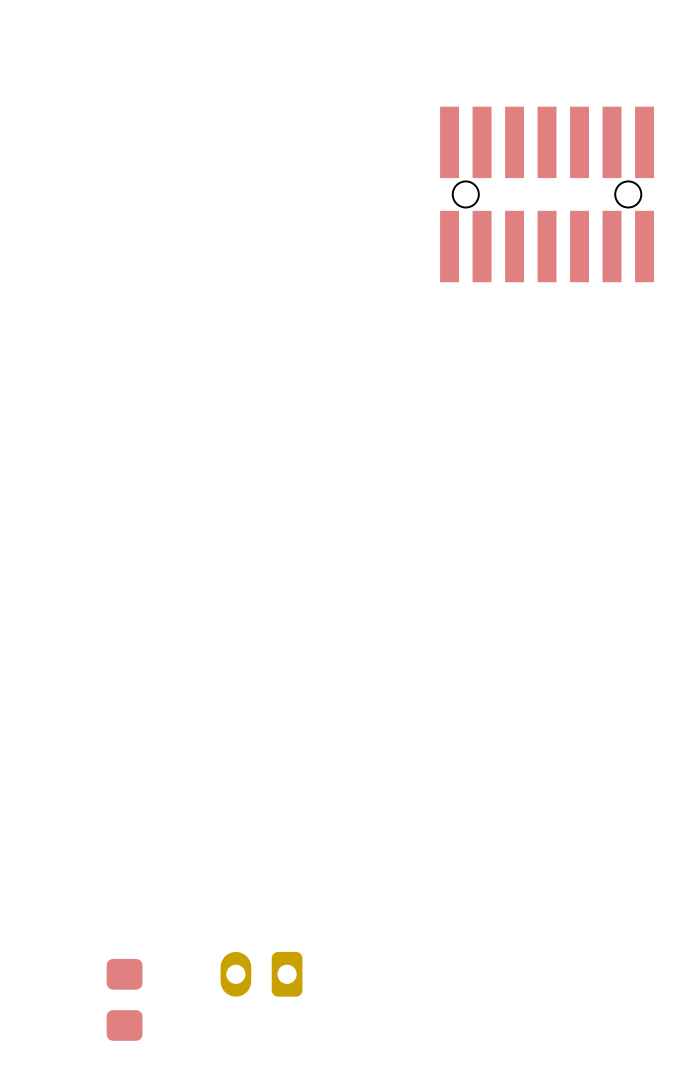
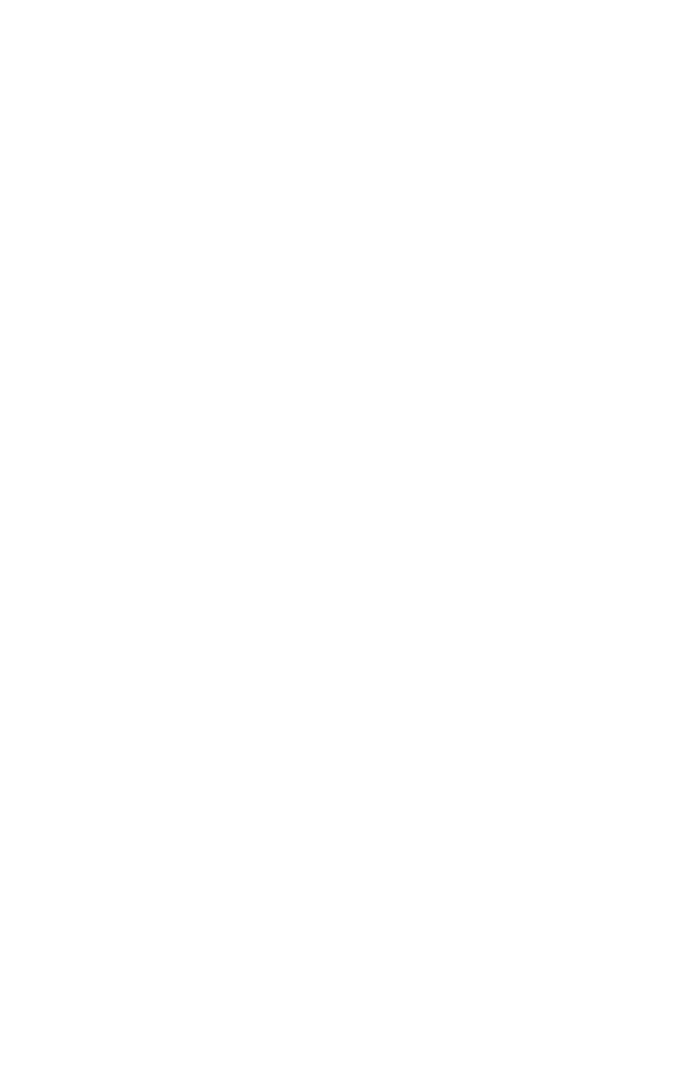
part: (547, 194) -> none
part: (261, 974) -> none
part: (124, 999) -> none

